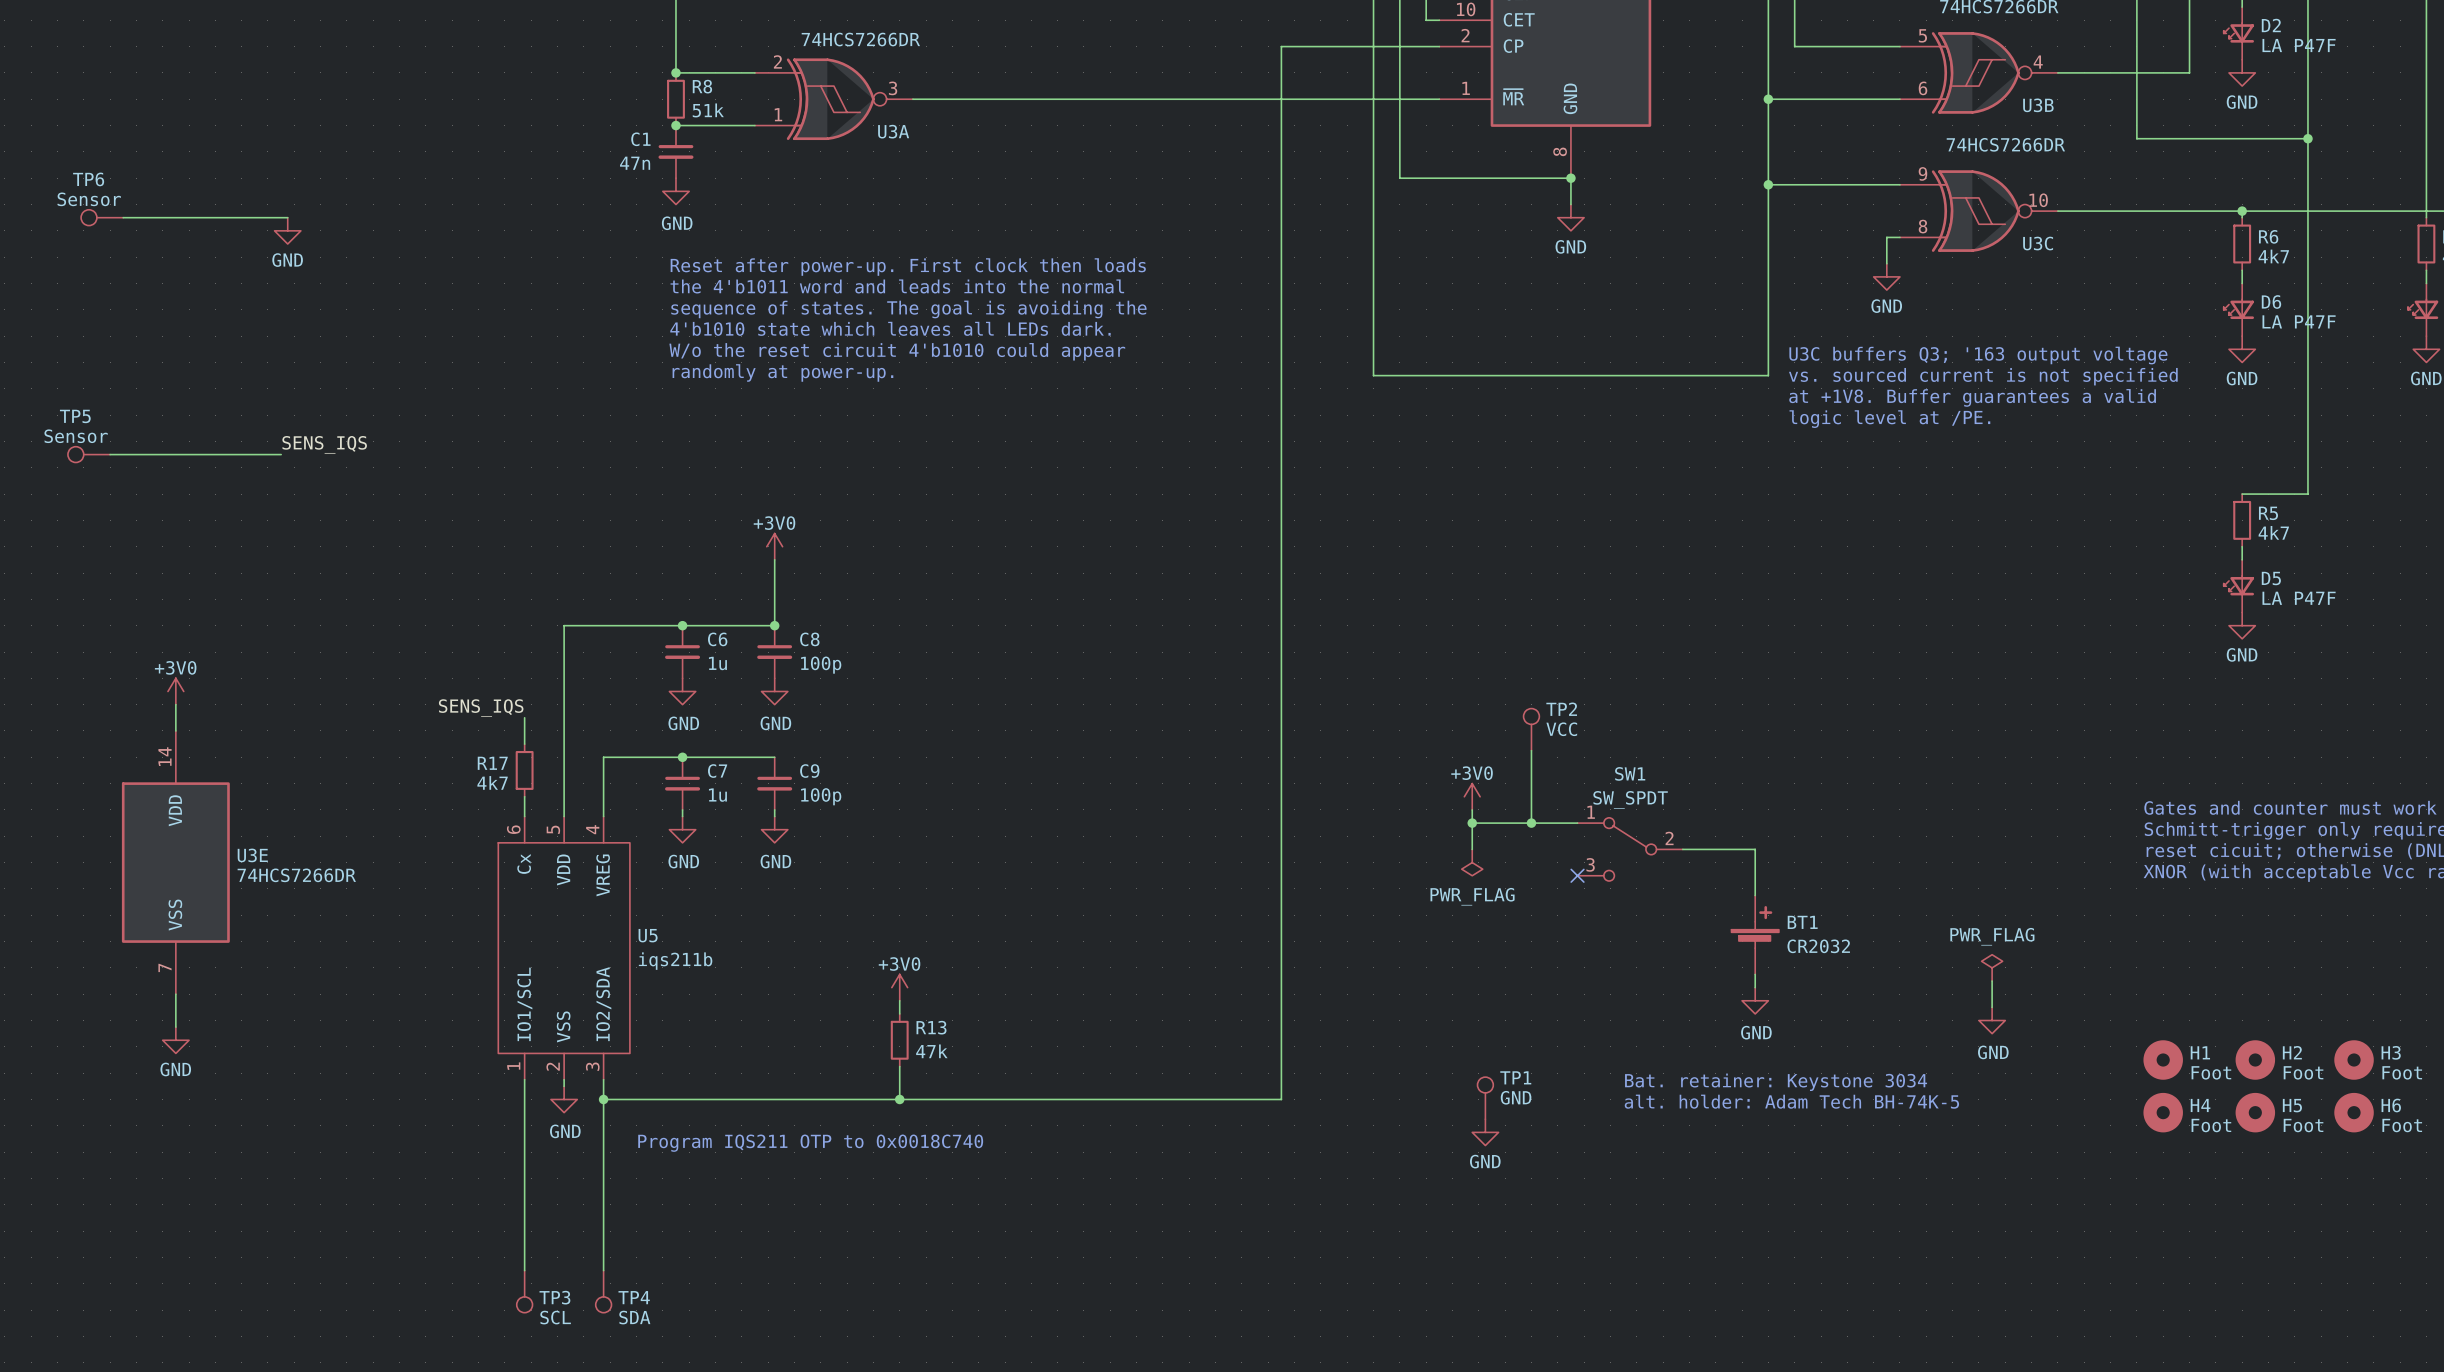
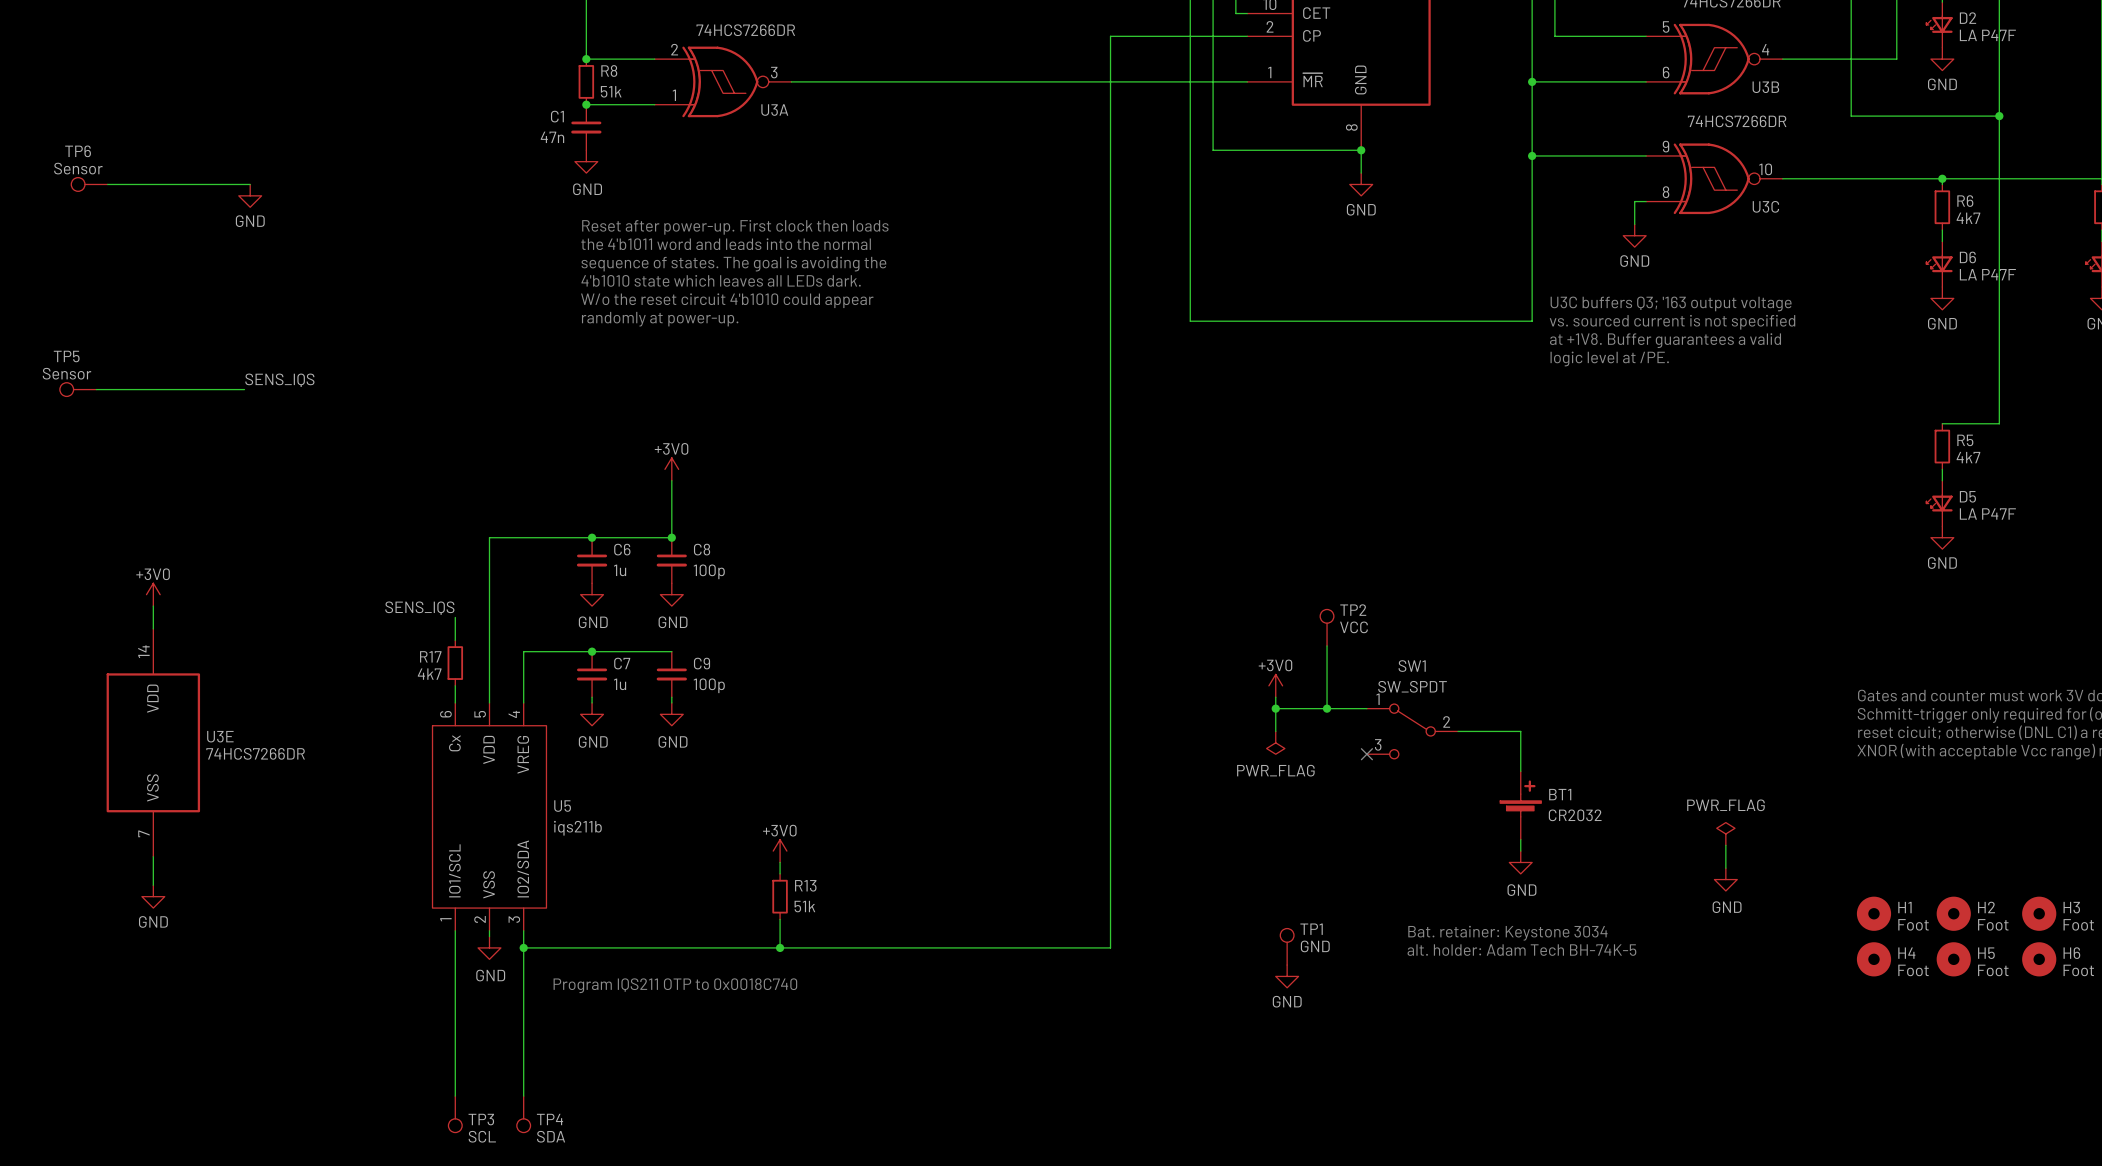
R13 value: 47k (931, 1051) -> 51k (804, 906)

